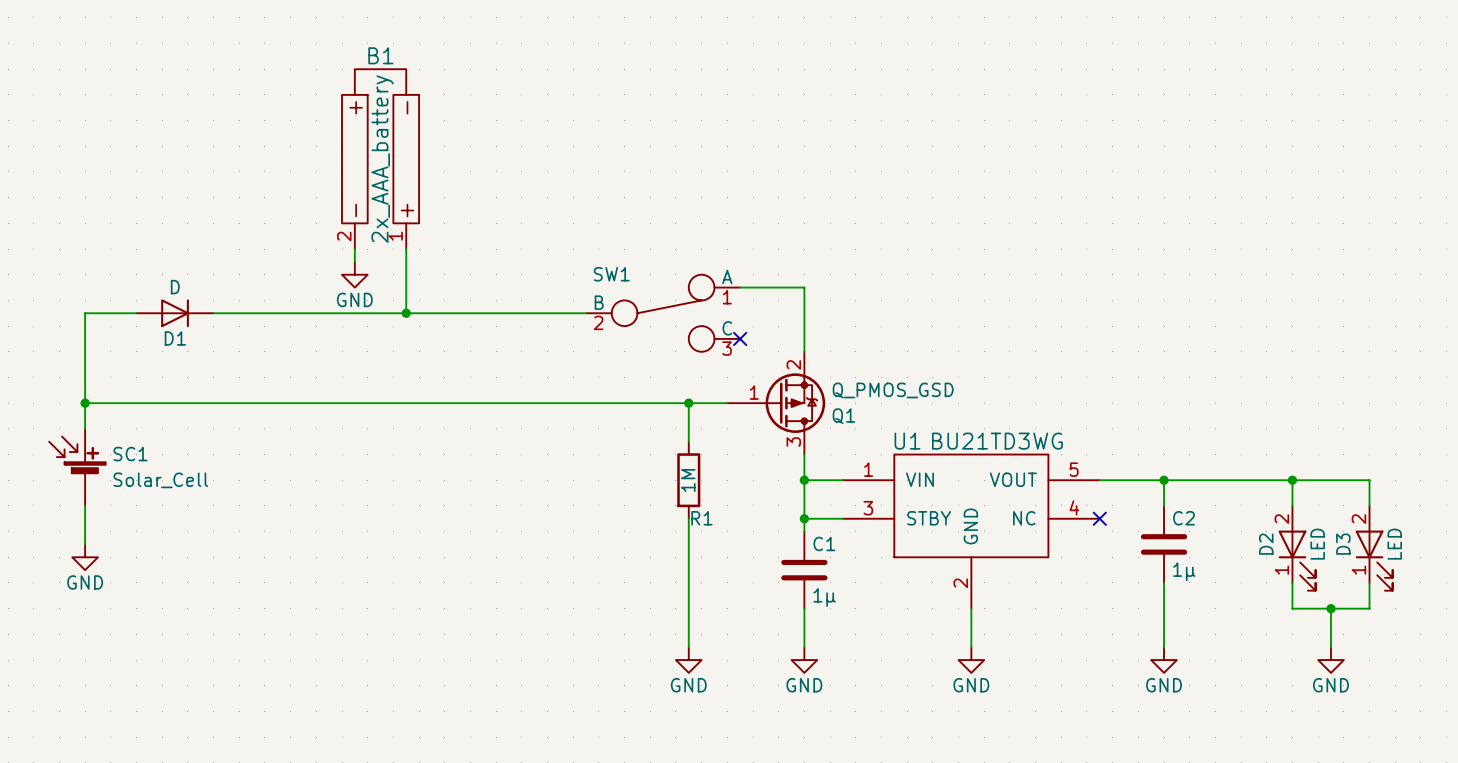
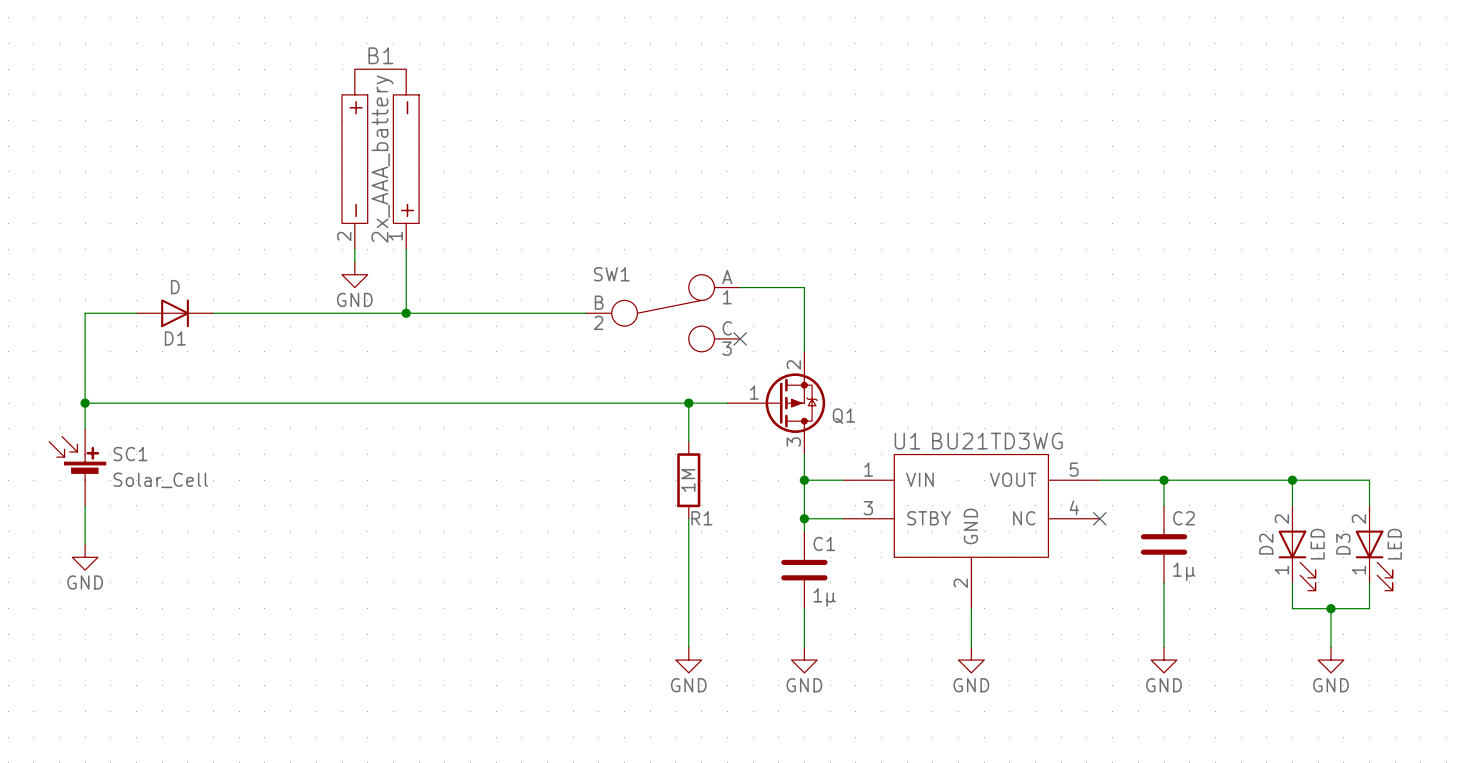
Q1 value: Q_PMOS_GSD (893, 390) -> none

